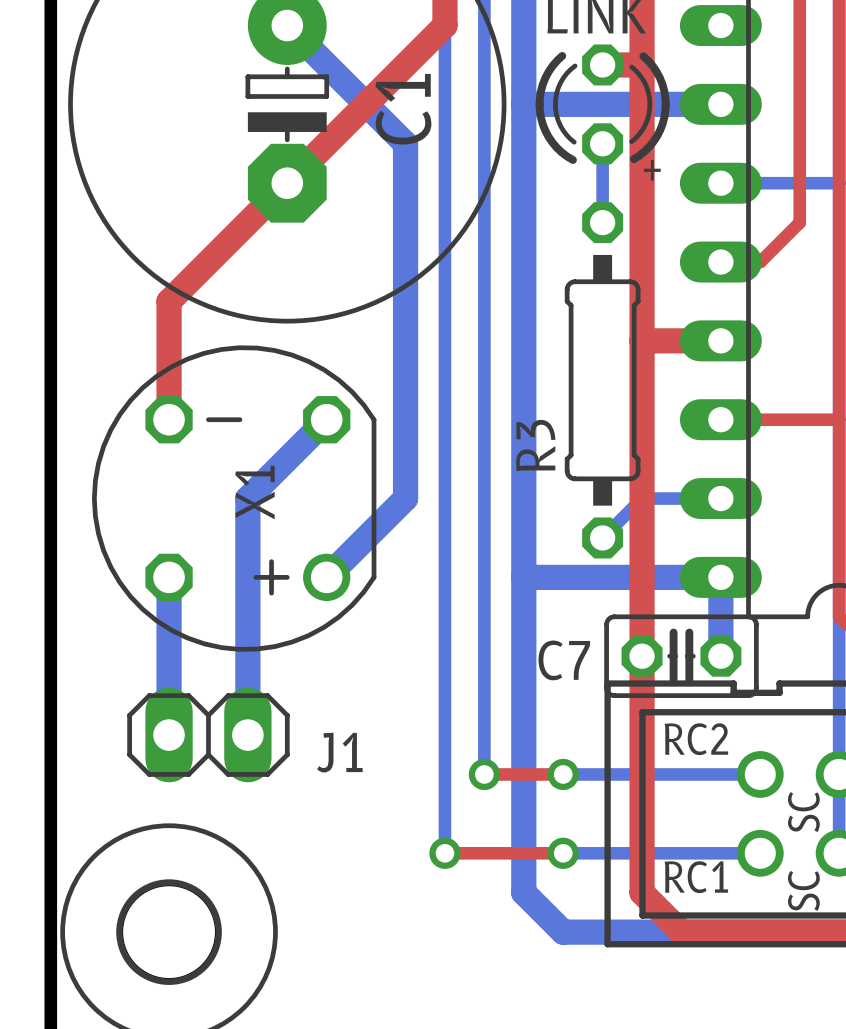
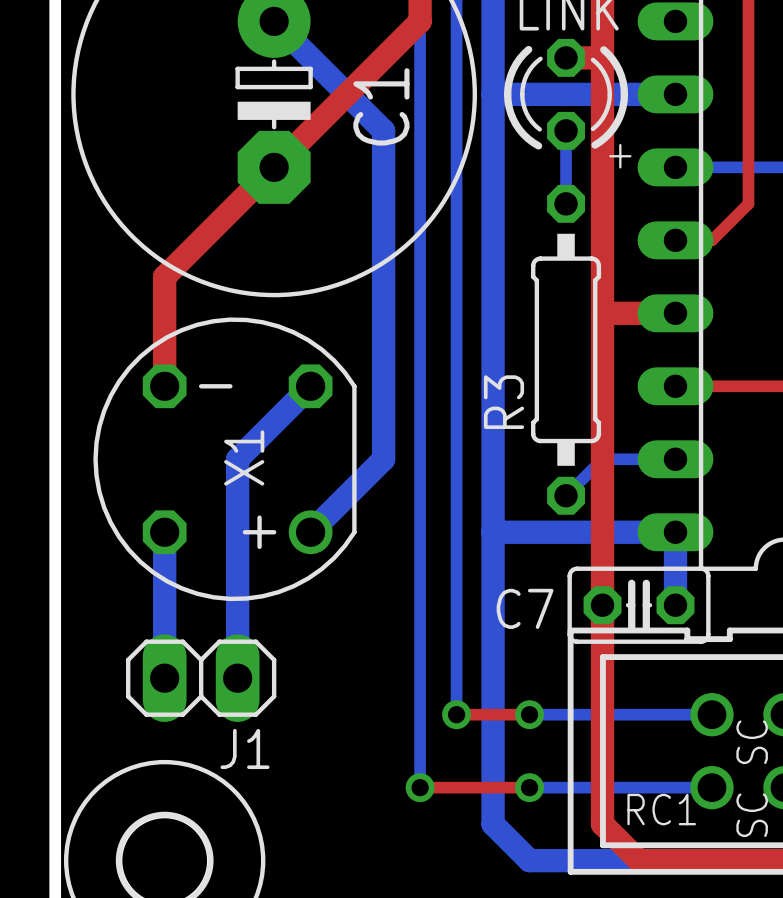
text: RC2 (696, 739) -> none
J1 name position: J1 (339, 752) -> J1 (245, 748)

